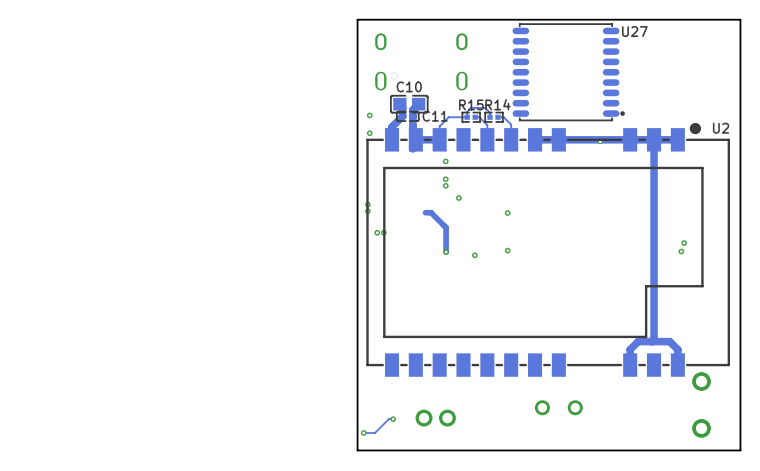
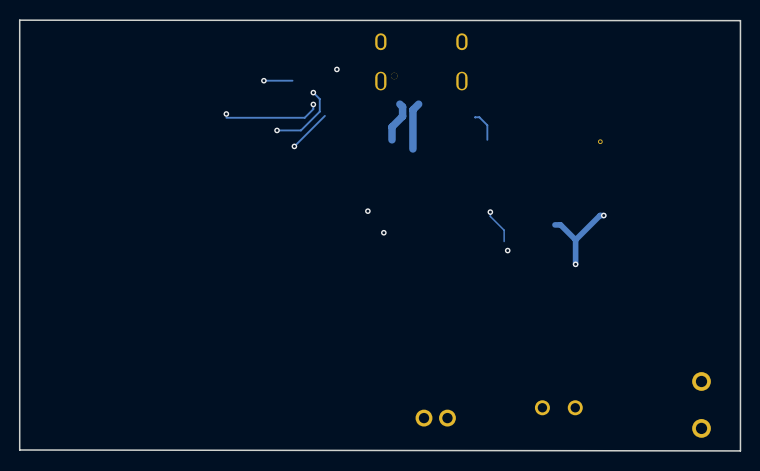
board edge: (740, 20) (357, 19) (357, 450) (740, 450) -> (740, 20) (19, 20) (19, 449) (740, 450)
via: none -> (336, 69)
U27: (568, 72) -> none
via: none -> (263, 80)
track: none -> (292, 80) (263, 80)
track: none -> (313, 92) (319, 99) (319, 111) (300, 130) (277, 130)
via: none -> (313, 92)
track: none -> (313, 104) (313, 109) (304, 117) (226, 117)
via: none -> (313, 104)
C10: (409, 104) -> none
via: none -> (226, 113)
track: none -> (324, 115) (294, 146)
via: (369, 115) -> none
C11: (407, 116) -> none
R15: (471, 117) -> none
track: (489, 117) (489, 112) (485, 107) (471, 107) (467, 111) (467, 117) (448, 117) (439, 126) (439, 139) (415, 139) (412, 136) -> none
R14: (494, 117) -> none
track: (498, 117) (503, 117) (511, 124) (511, 139) -> none
via: none -> (277, 130)
via: (369, 133) -> none
track: (654, 139) (654, 339) (652, 341) -> none
track: (677, 139) (535, 139) -> none
via: none -> (294, 146)
via: (445, 161) -> none
via: (445, 179) -> none
via: (445, 185) -> none
via: (458, 198) -> none
via: (367, 204) -> none
track: (425, 212) (431, 212) (446, 227) (446, 252) -> none
track: none -> (490, 212) (490, 216) (504, 230) (504, 241)
via: none -> (490, 212)
via: (507, 213) -> none
track: none -> (603, 215) (600, 215) (575, 239)
via: none -> (603, 215)
track: none -> (554, 224) (560, 224) (575, 239)
via: (377, 232) -> none
track: none -> (575, 239) (575, 264)
via: (684, 243) -> none
U2: (548, 249) -> none
via: (681, 251) -> none
via: (446, 252) -> none
via: (474, 255) -> none
via: none -> (575, 264)
track: (677, 365) (677, 349) (669, 341) (638, 341) (630, 349) (630, 365) -> none
track: (393, 419) (388, 419) (375, 432) (363, 432) -> none
via: (393, 419) -> none
via: (363, 432) -> none

